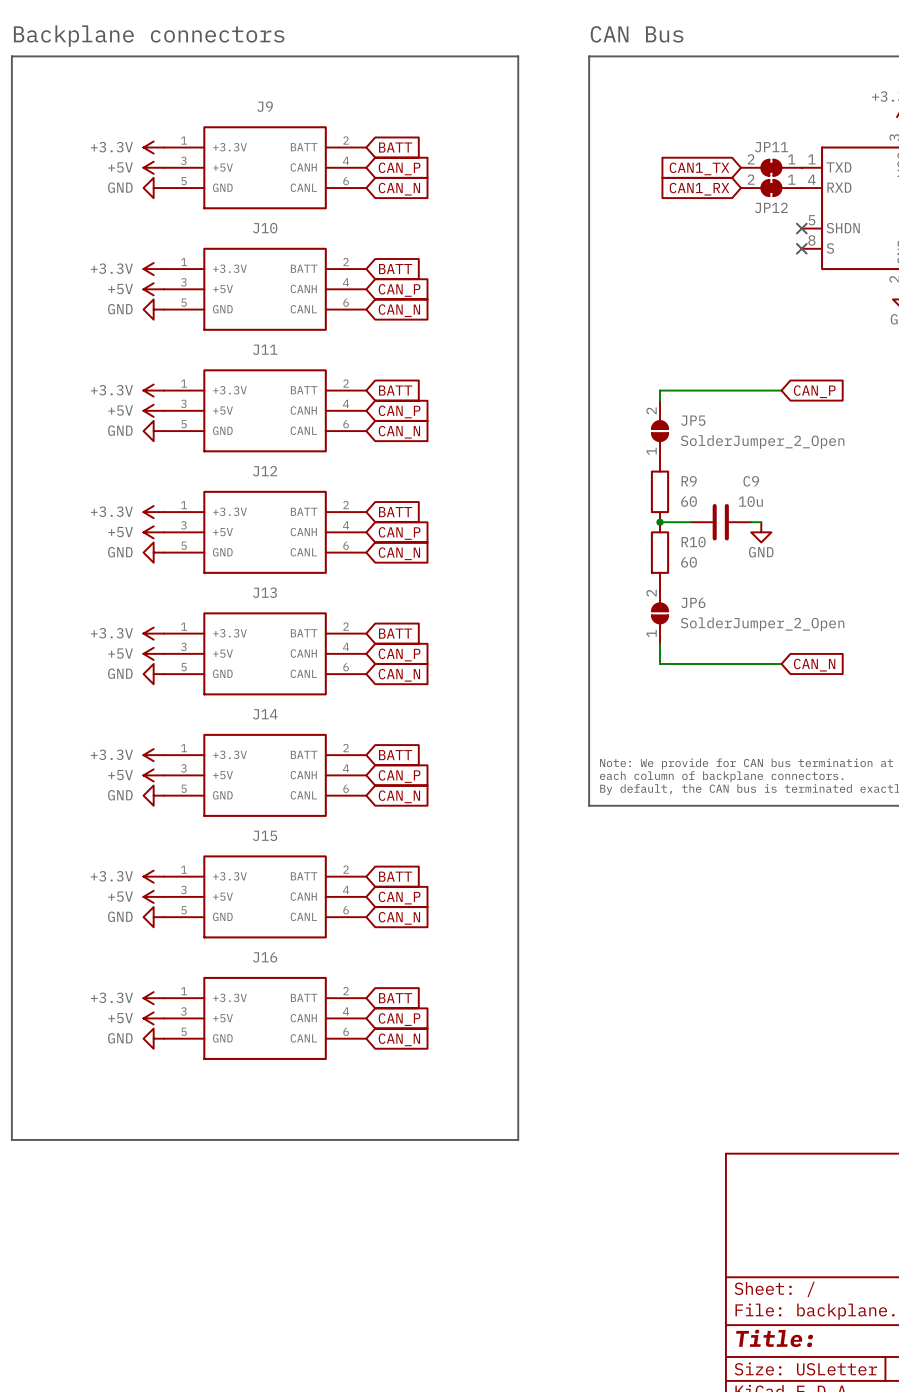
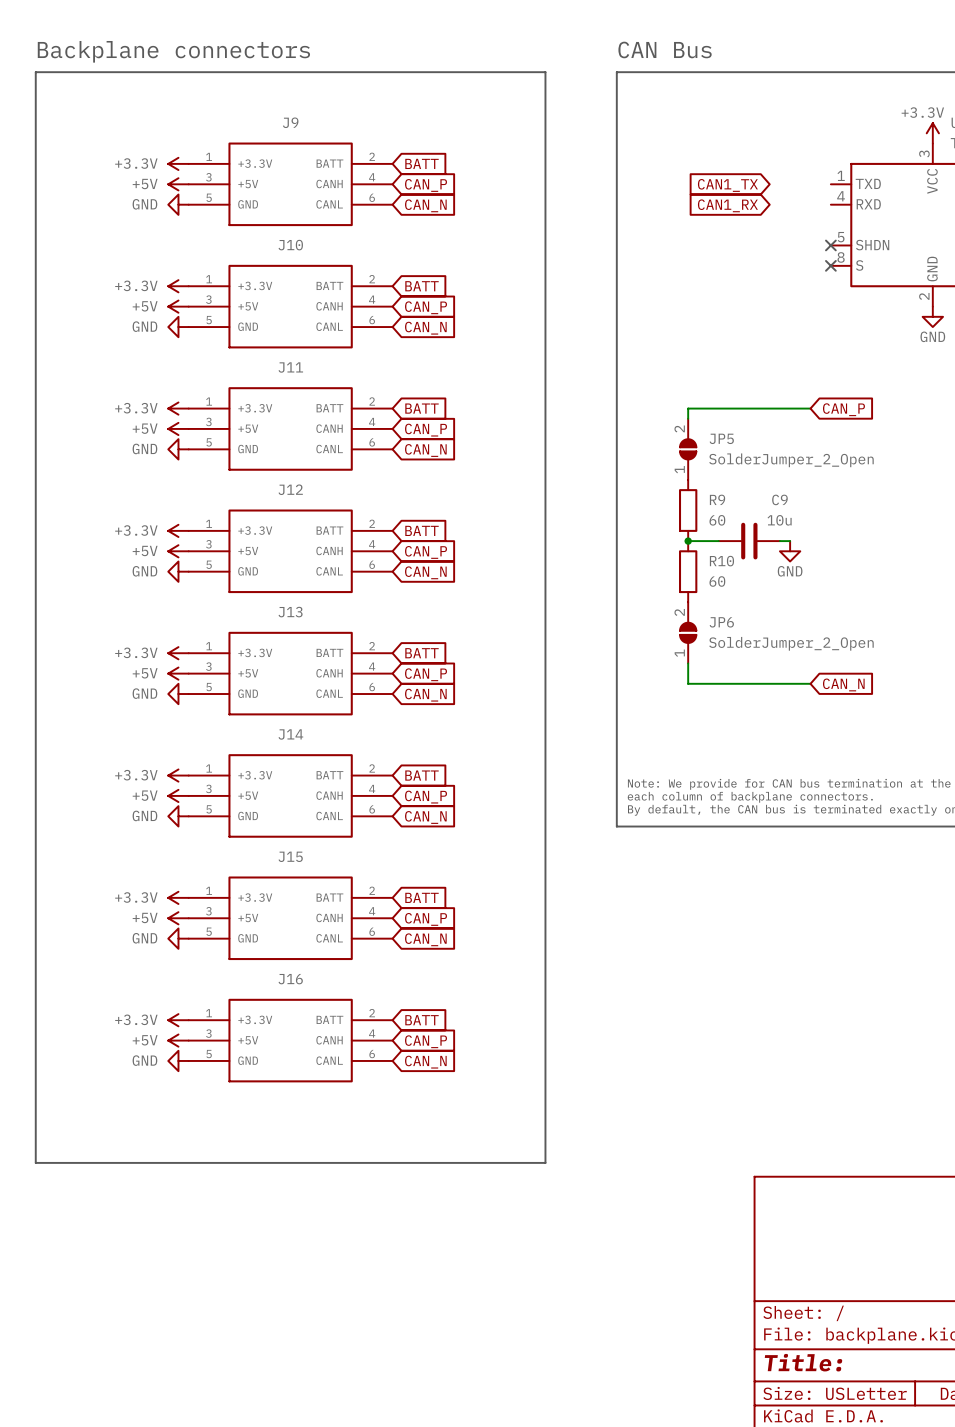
JP11: (771, 167) -> none
JP12: (771, 188) -> none

